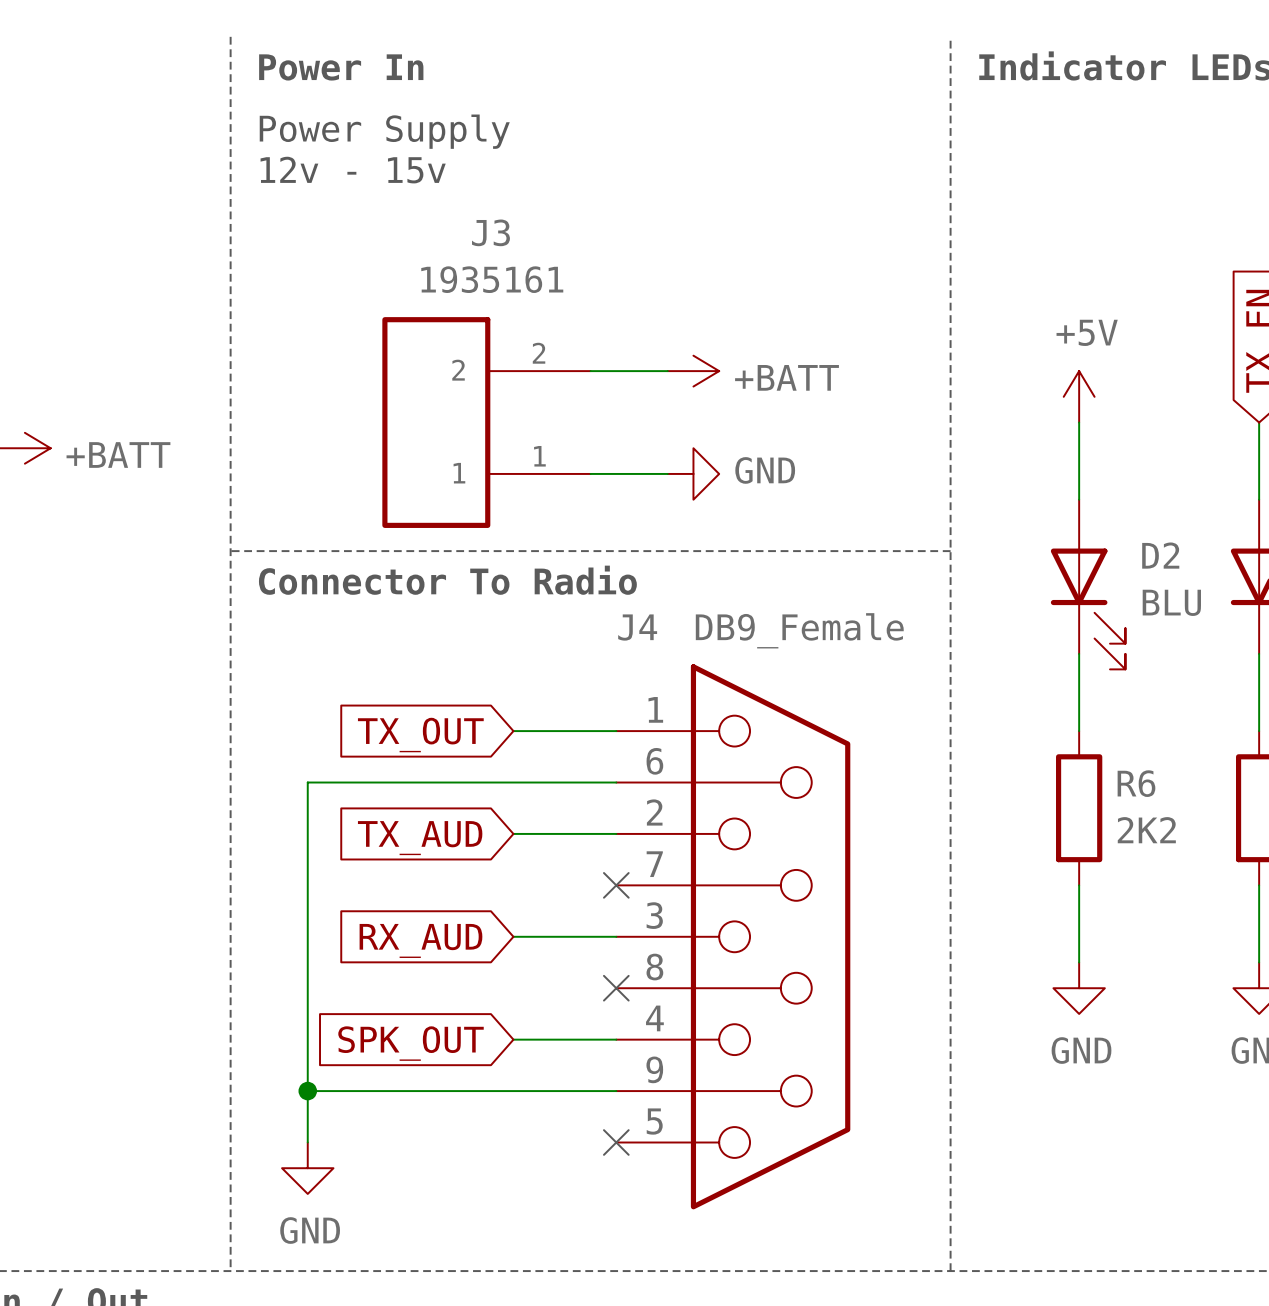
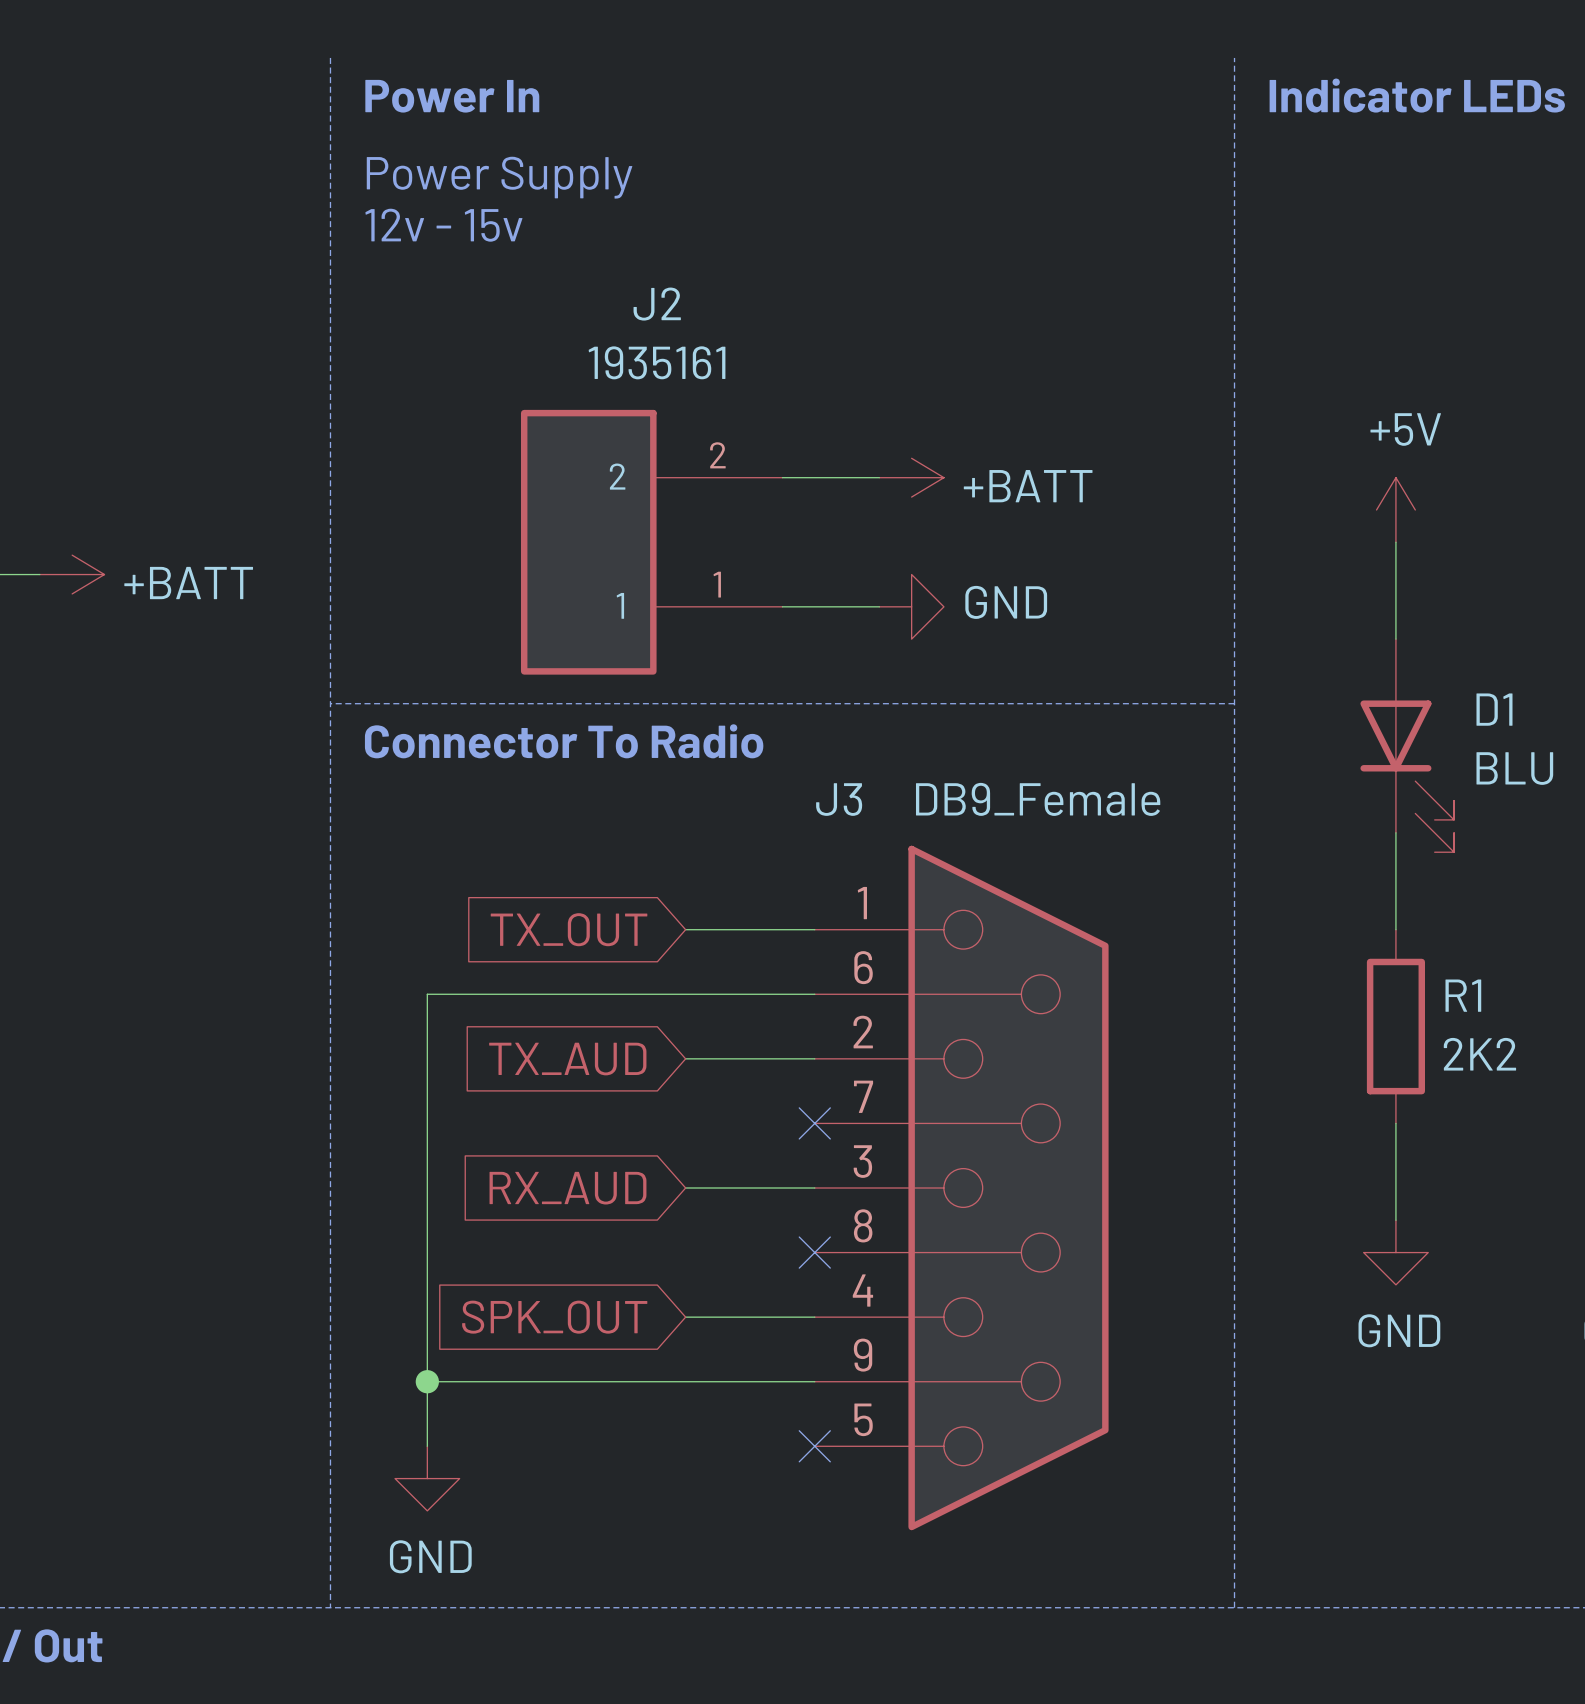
J3 name: J3 (490, 232) -> J2 (657, 304)
D2 name: D2 (1160, 555) -> D1 (1494, 709)
J4 name: J4 (637, 627) -> J3 (839, 799)
R6 name: R6 (1136, 783) -> R1 (1463, 995)

